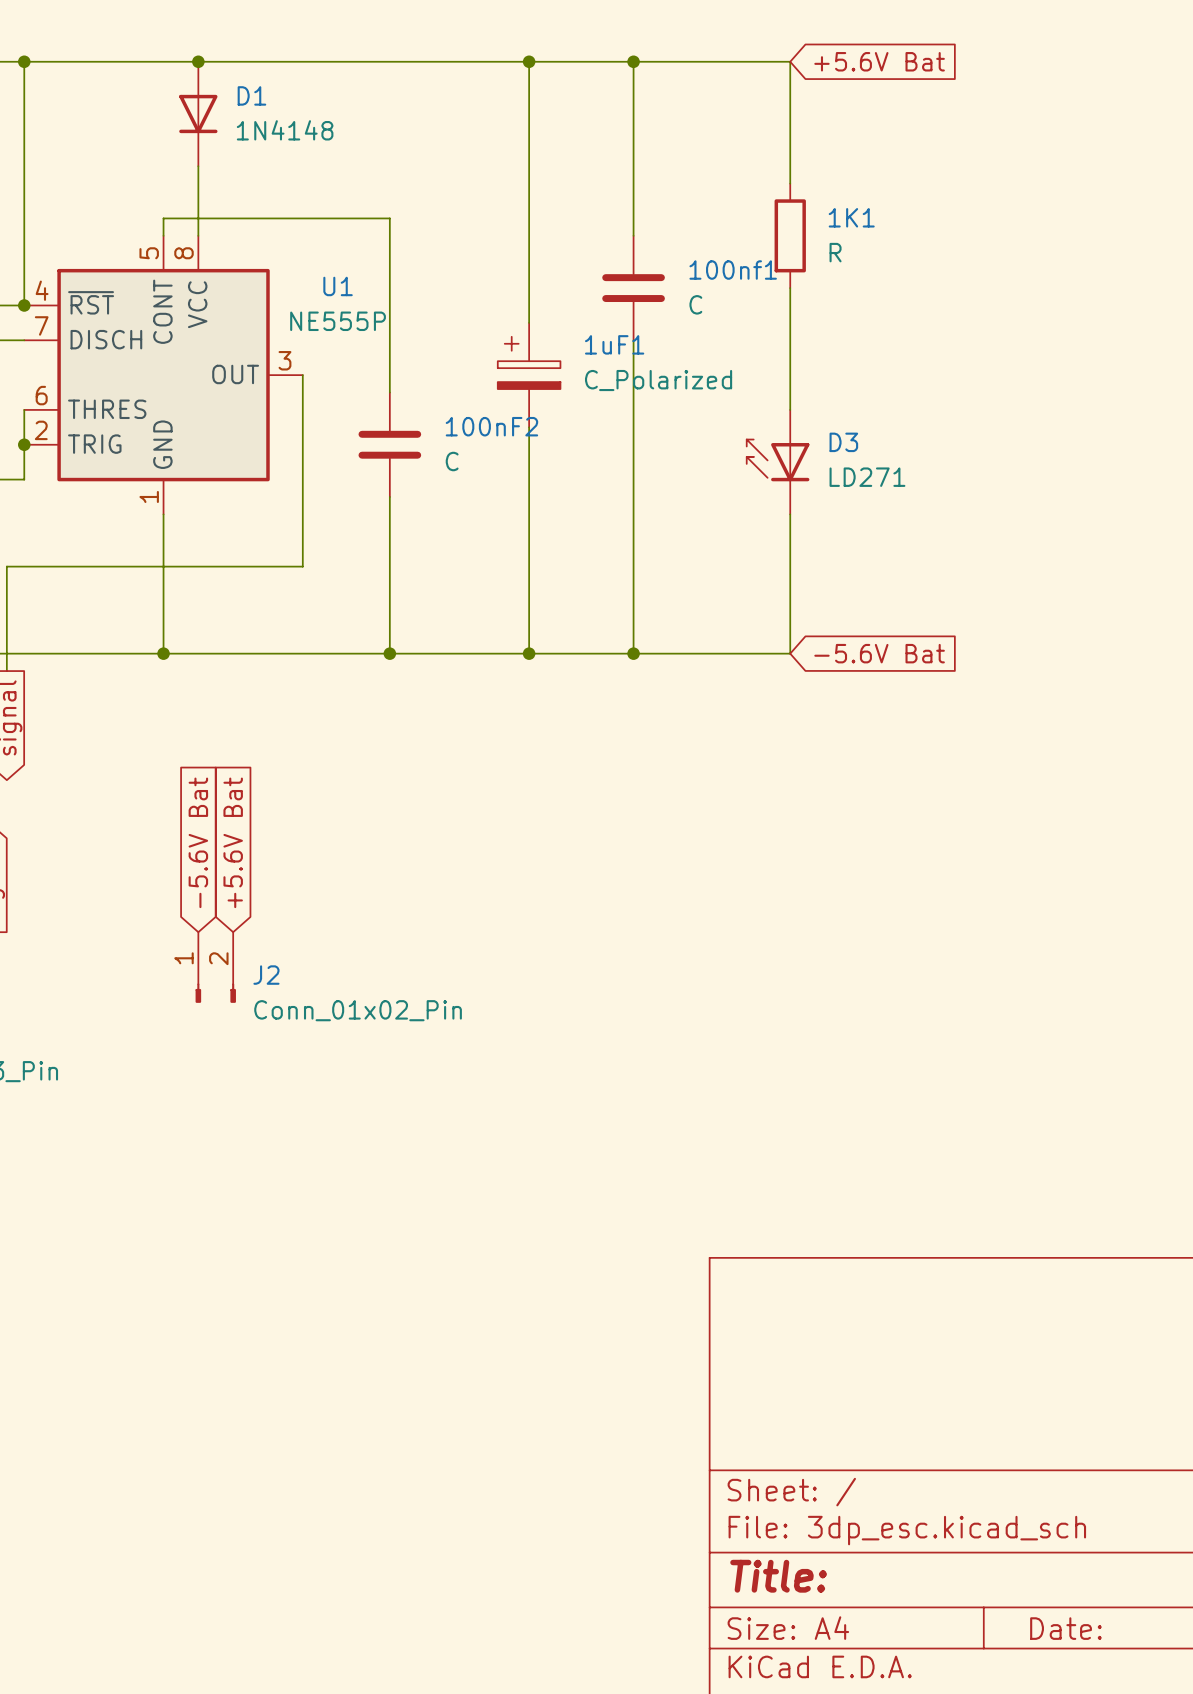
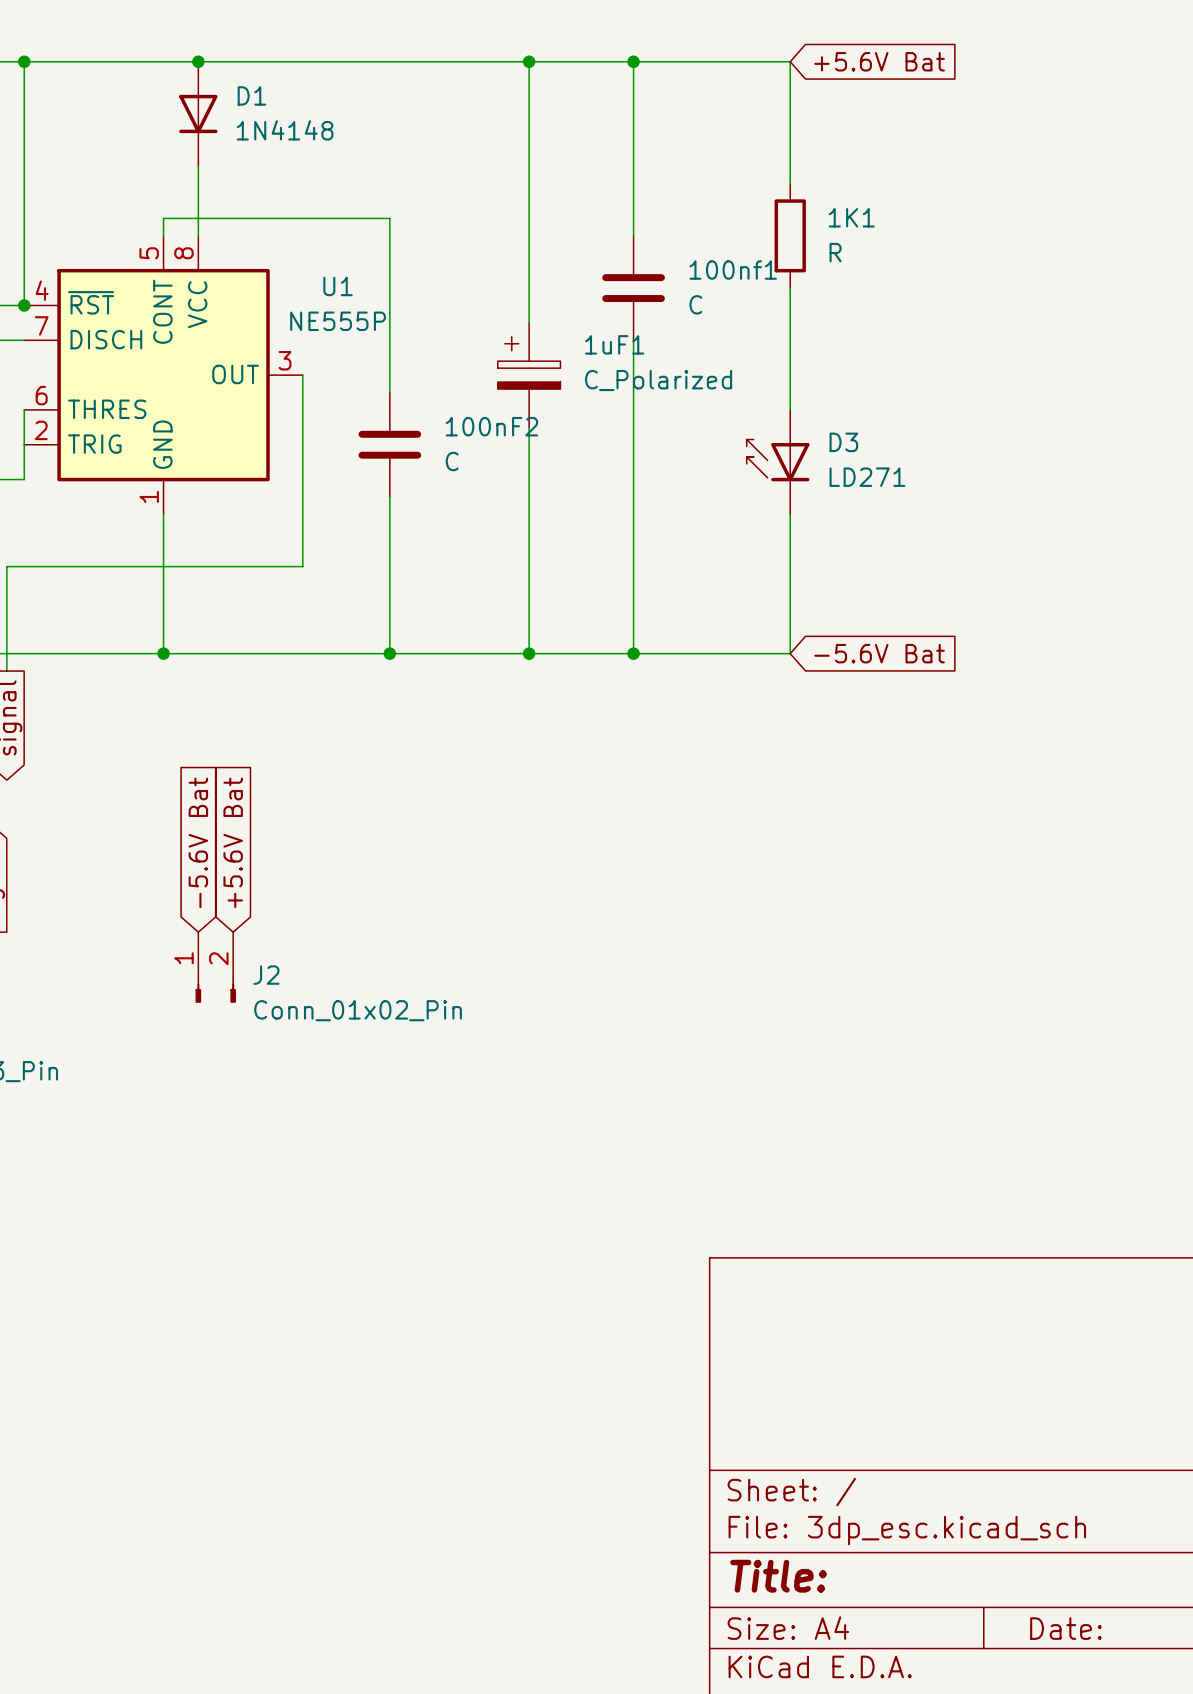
junction: (24, 444) -> none

